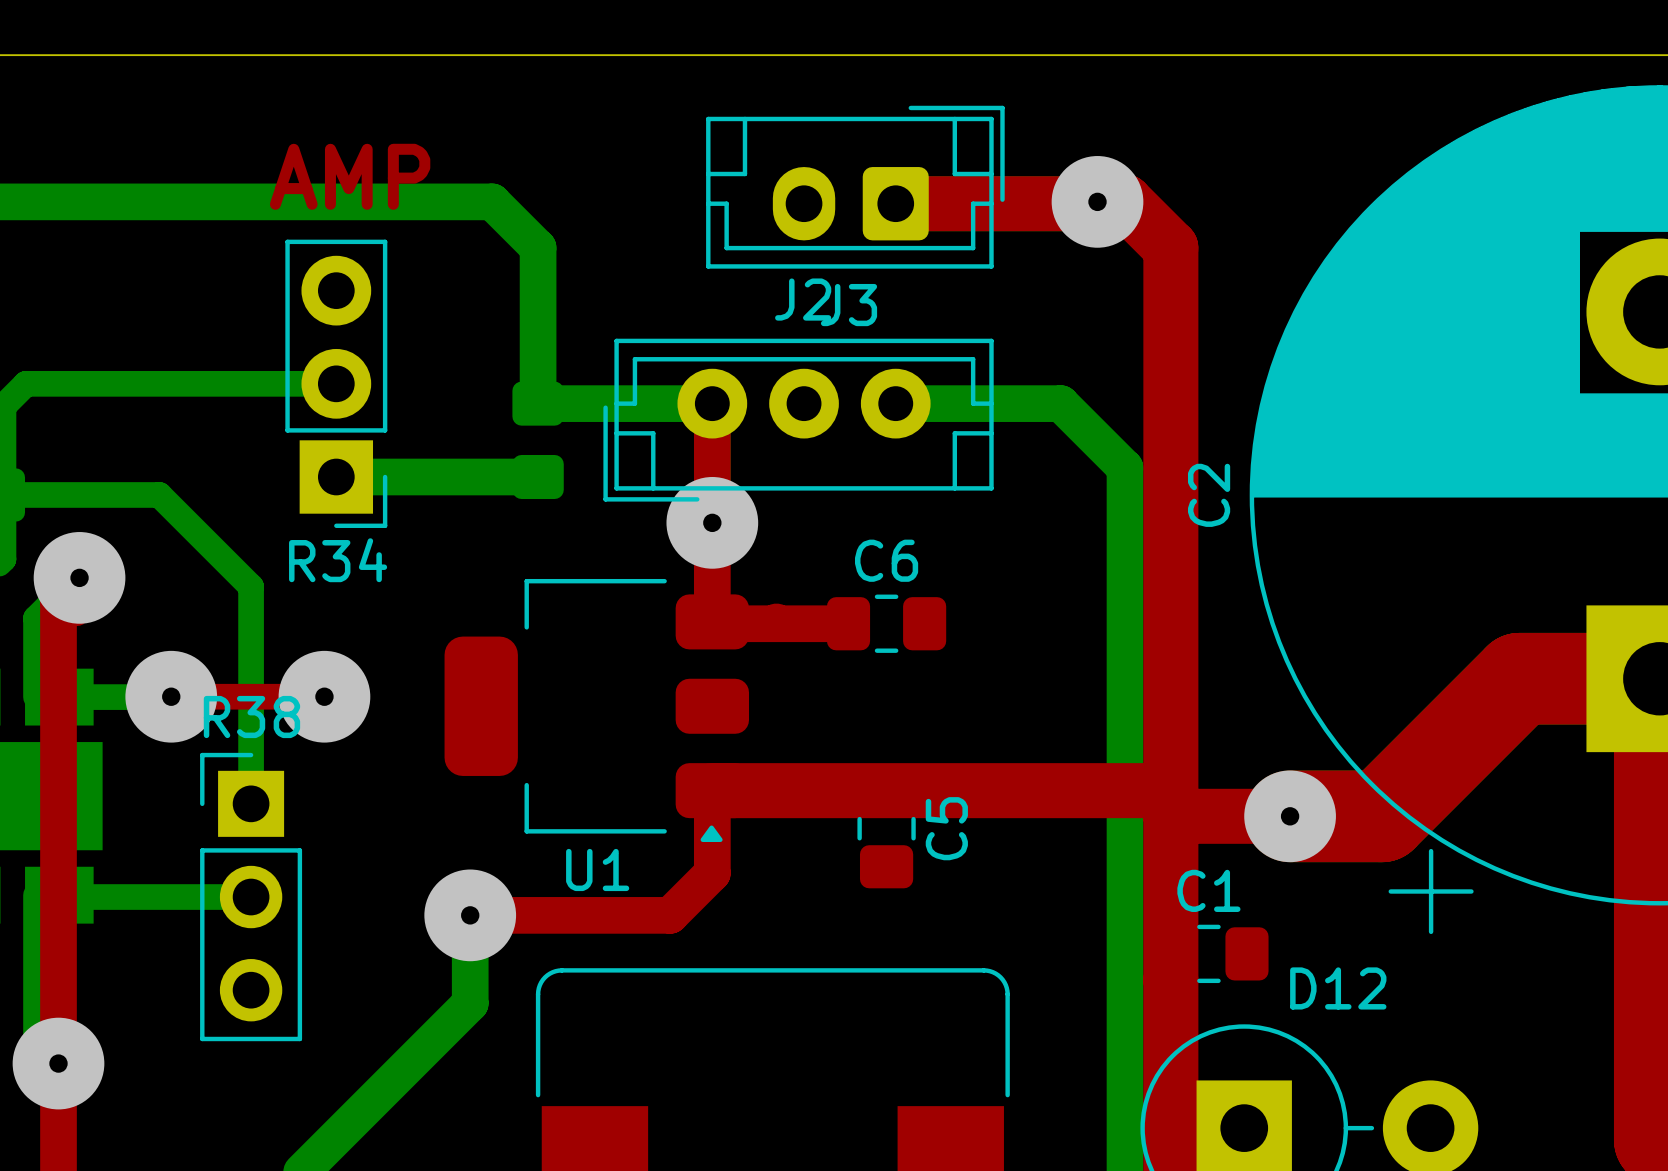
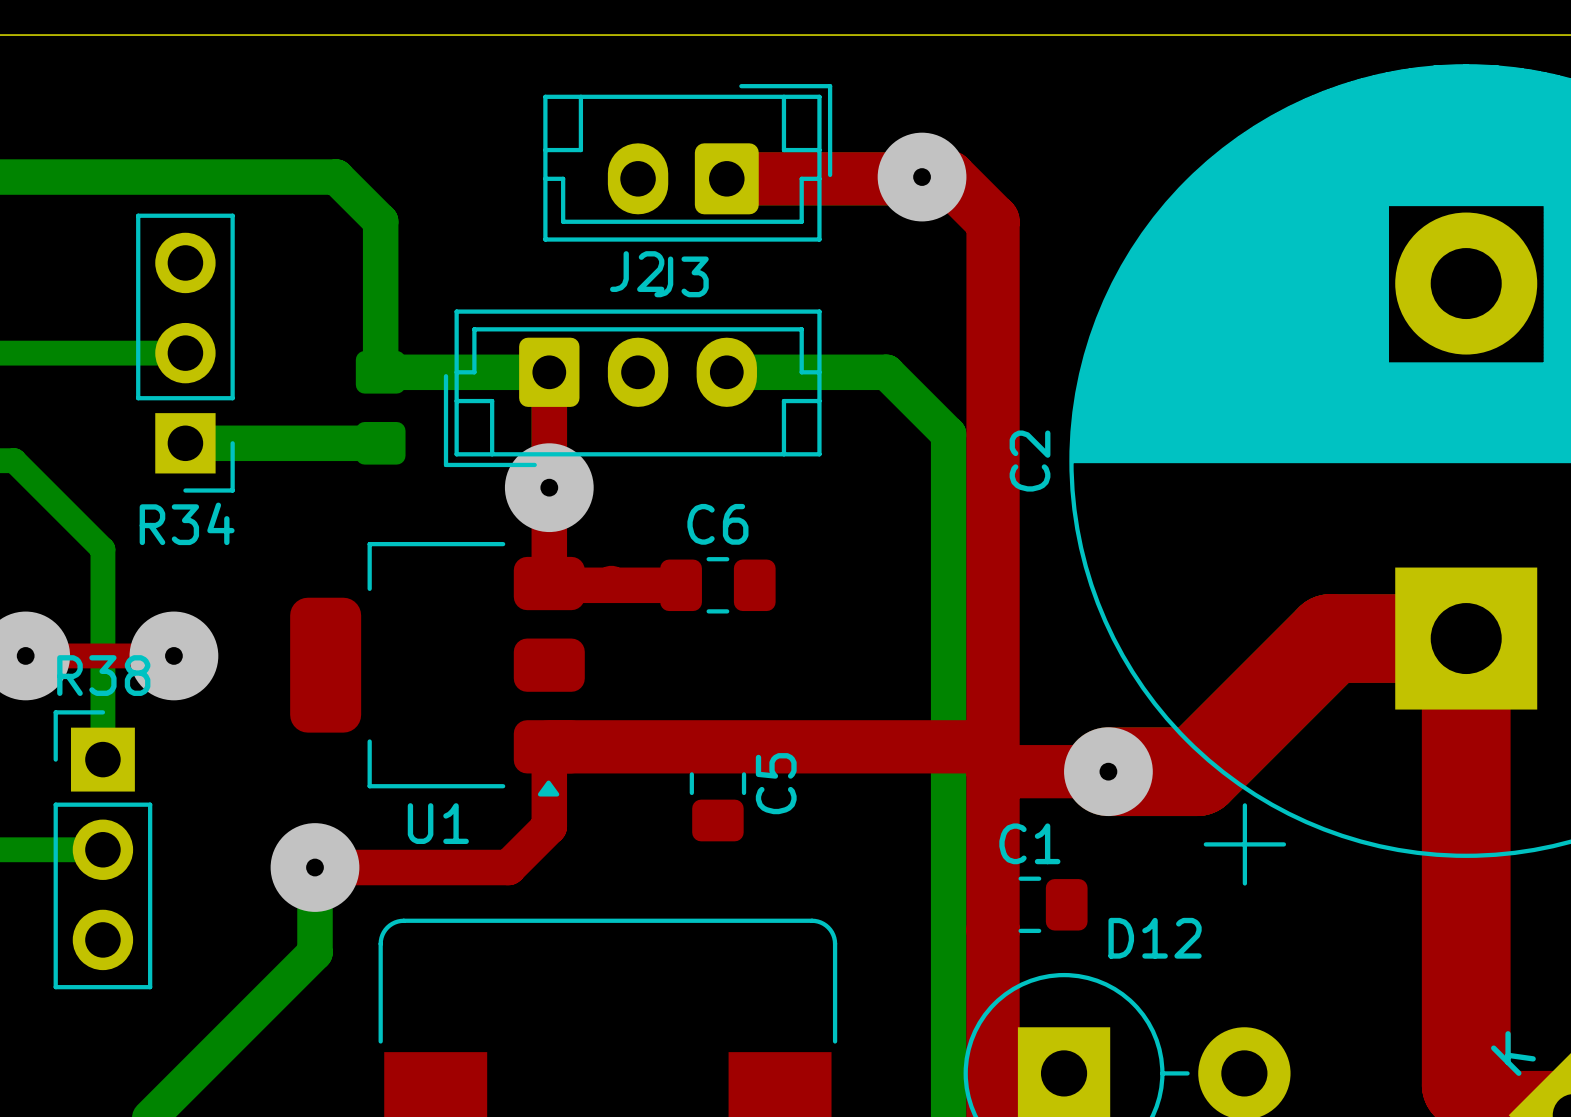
text: AMP (350, 176) -> none
R34 footprint: [285, 239, 388, 528] -> [136, 213, 235, 493]
J2 footprint: [603, 338, 994, 502] -> [443, 309, 822, 468]

